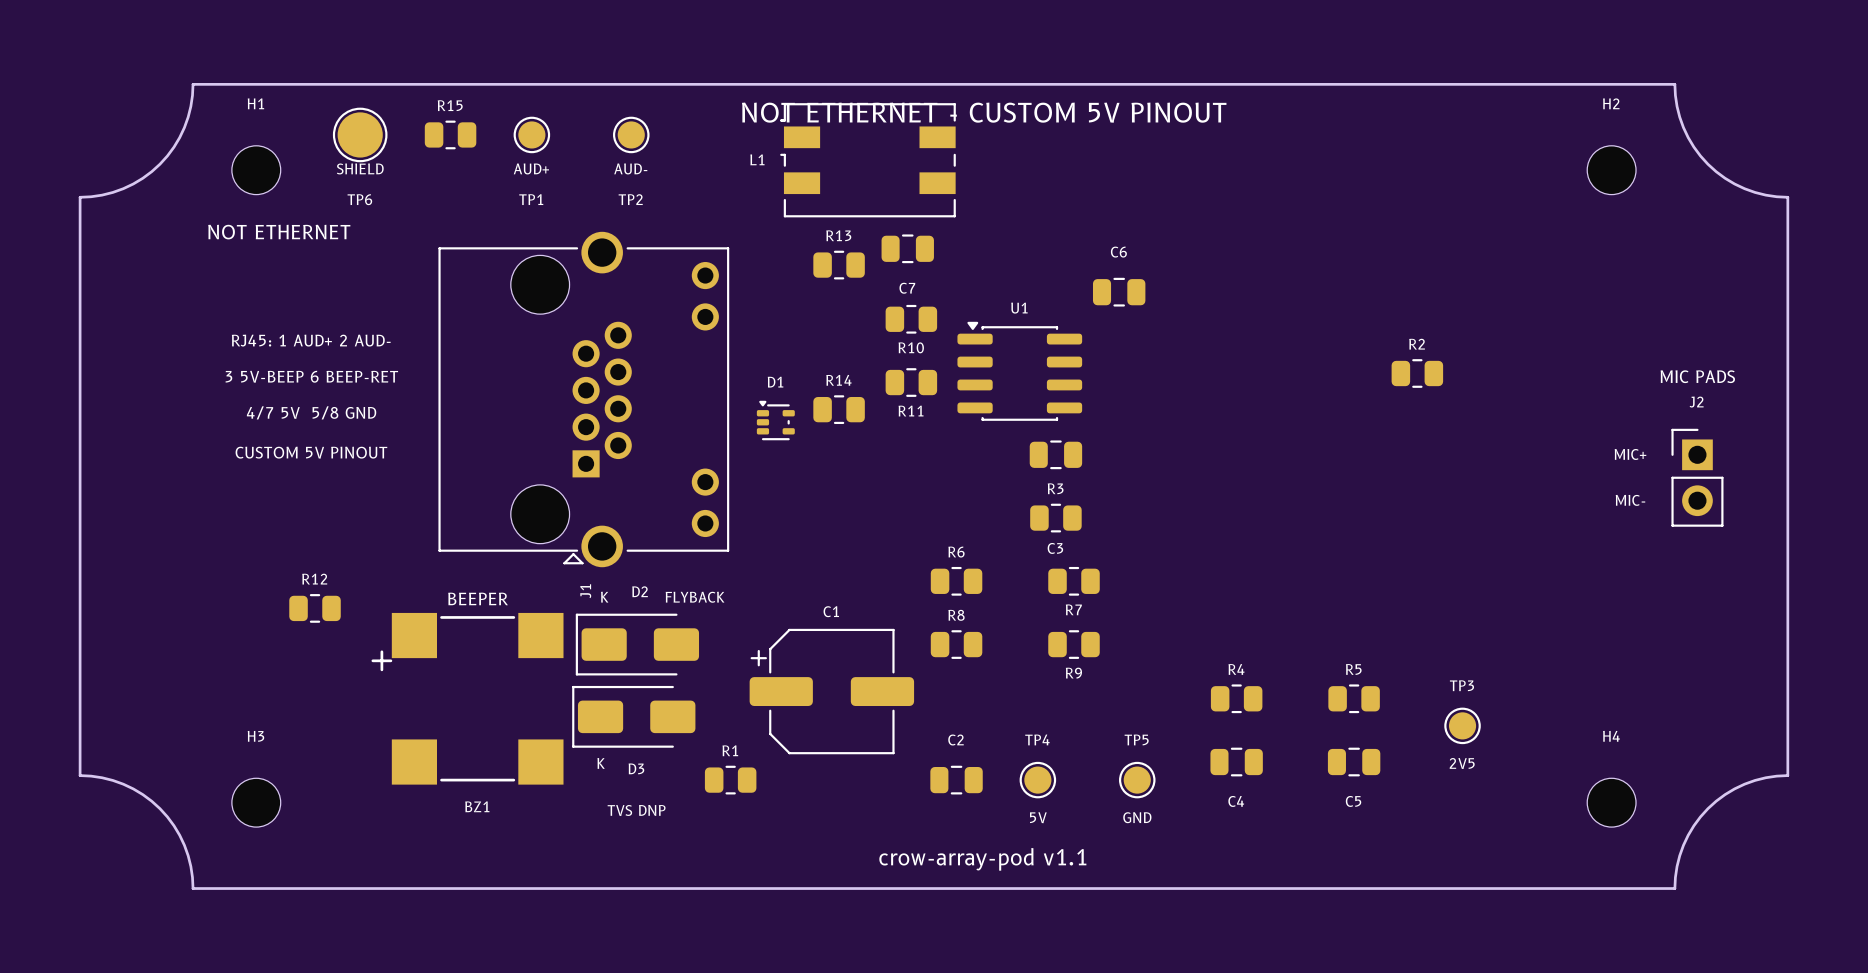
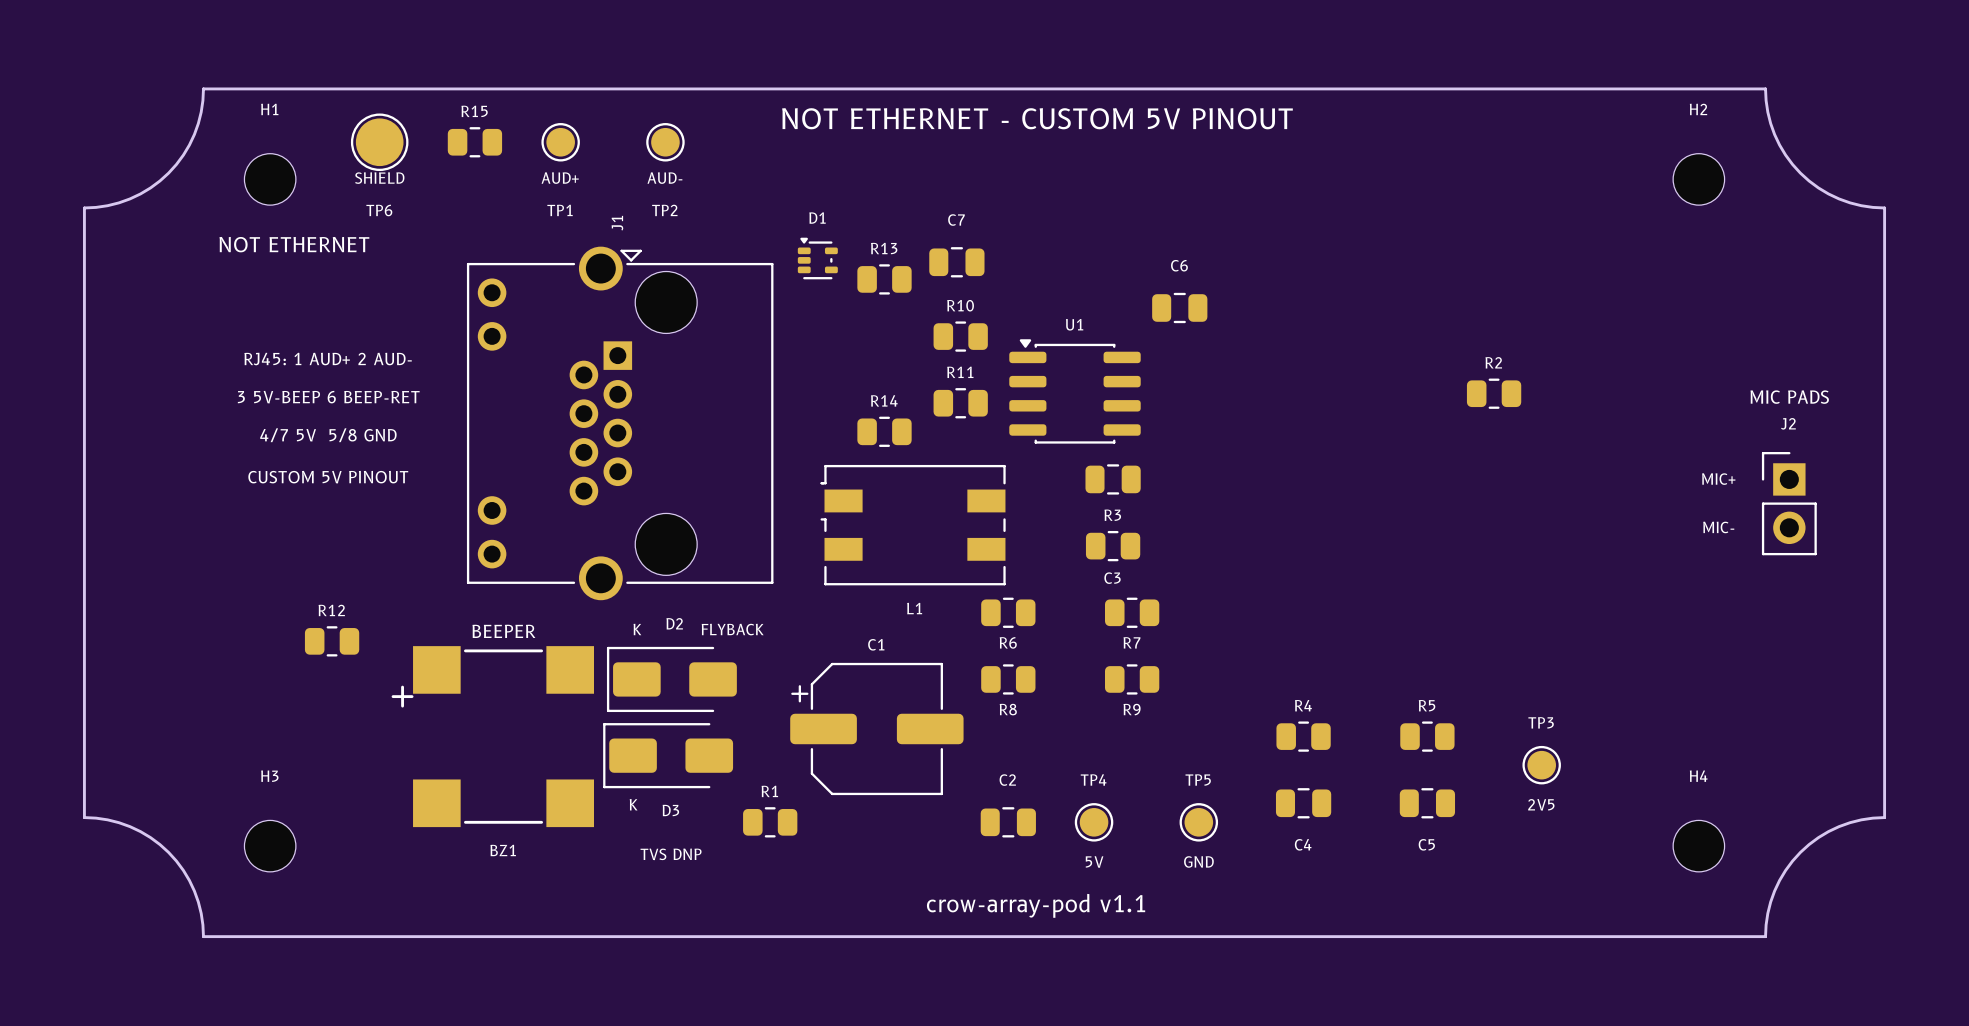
L1 name position: L1 (757, 159) -> L1 (914, 608)
L1 position: (868, 160) -> (913, 525)
C7 name position: C7 (907, 288) -> C7 (956, 220)
R10 name position: R10 (911, 347) -> R10 (960, 305)
J1 rotation: 0° (583, 399) -> 180° (620, 423)
R11 name position: R11 (911, 411) -> R11 (960, 372)
D1 position: (775, 420) -> (817, 258)
R6 name position: R6 (956, 552) -> R6 (1008, 642)
R8 name position: R8 (956, 615) -> R8 (1008, 709)

